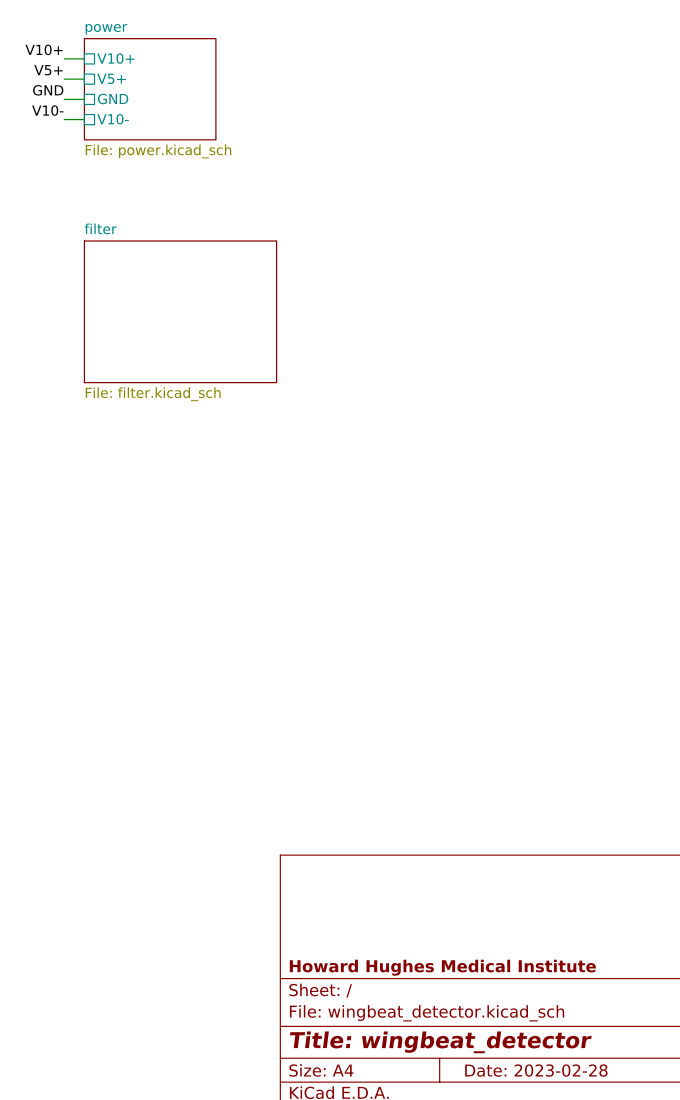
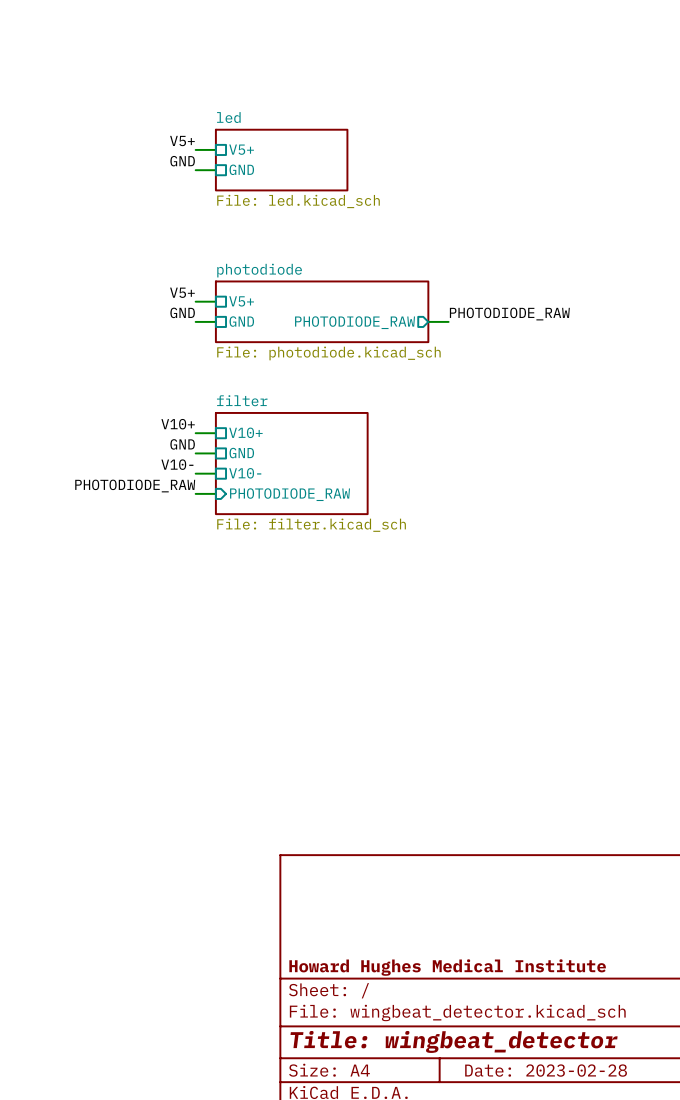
label: V10+ (44, 49) -> none
wire: (64, 58) (84, 58) -> none
sheet pin: V10+ (115, 58) -> none
label: V5+ (48, 70) -> none
sheet pin: V5+ (111, 78) -> none
wire: (64, 79) (84, 79) -> none
sheet power: File: power.kicad_sch (150, 89) -> none
label: GND (48, 90) -> none
wire: (64, 99) (84, 99) -> (195, 149) (215, 149)
sheet pin: GND (113, 99) -> none
label: V10- (47, 110) -> none
wire: (64, 119) (84, 119) -> (195, 170) (215, 170)
sheet pin: V10- (113, 119) -> none
label: none -> V5+ (182, 141)
sheet pin: none -> V5+ (241, 149)
sheet led: none -> File: led.kicad_sch (281, 160)
label: none -> GND (182, 161)
sheet pin: none -> GND (241, 169)
label: none -> V5+ (182, 292)
wire: none -> (195, 301) (215, 301)
sheet pin: none -> V5+ (241, 301)
sheet filter: File: filter.kicad_sch (180, 311) -> none
sheet photodiode: none -> File: photodiode.kicad_sch (322, 311)
label: none -> GND (182, 312)
label: none -> PHOTODIODE_RAW (509, 314)
wire: none -> (195, 321) (215, 321)
sheet pin: none -> GND (241, 321)
wire: none -> (428, 321) (448, 321)
sheet pin: none -> PHOTODIODE_RAW (355, 322)
label: none -> V10+ (178, 424)
sheet pin: none -> V10+ (245, 432)
wire: none -> (195, 433) (215, 433)
label: none -> GND (182, 444)
wire: none -> (195, 453) (215, 453)
sheet pin: none -> GND (241, 453)
sheet filter: none -> File: filter.kicad_sch (291, 463)
label: none -> V10- (177, 464)
wire: none -> (195, 473) (215, 473)
sheet pin: none -> V10- (245, 473)
label: none -> PHOTODIODE_RAW (135, 486)
wire: none -> (195, 493) (215, 493)
sheet pin: none -> PHOTODIODE_RAW (290, 494)

